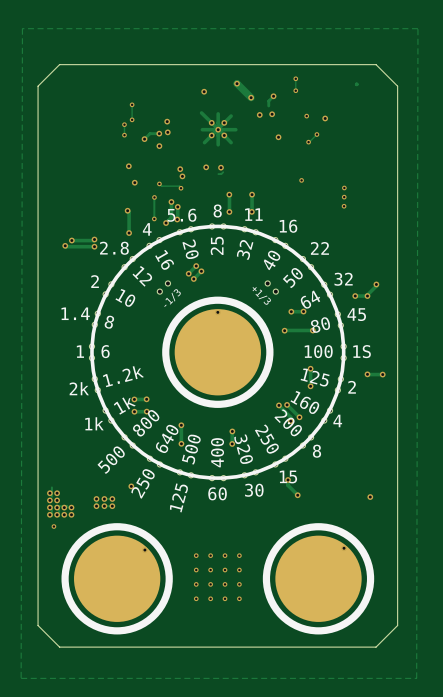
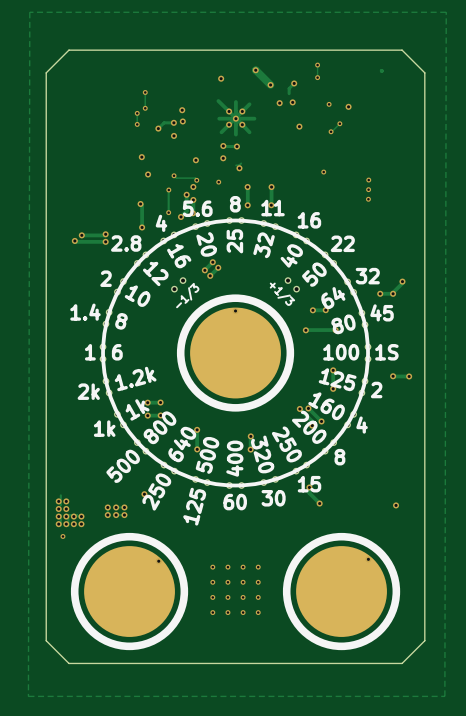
track: none -> (223, 146) (236, 146)
via: none -> (223, 146)
via: none -> (236, 146)
via: (220, 167) -> none
via: (182, 176) -> none
via: none -> (239, 168)
via: none -> (218, 182)
via: none -> (193, 186)

